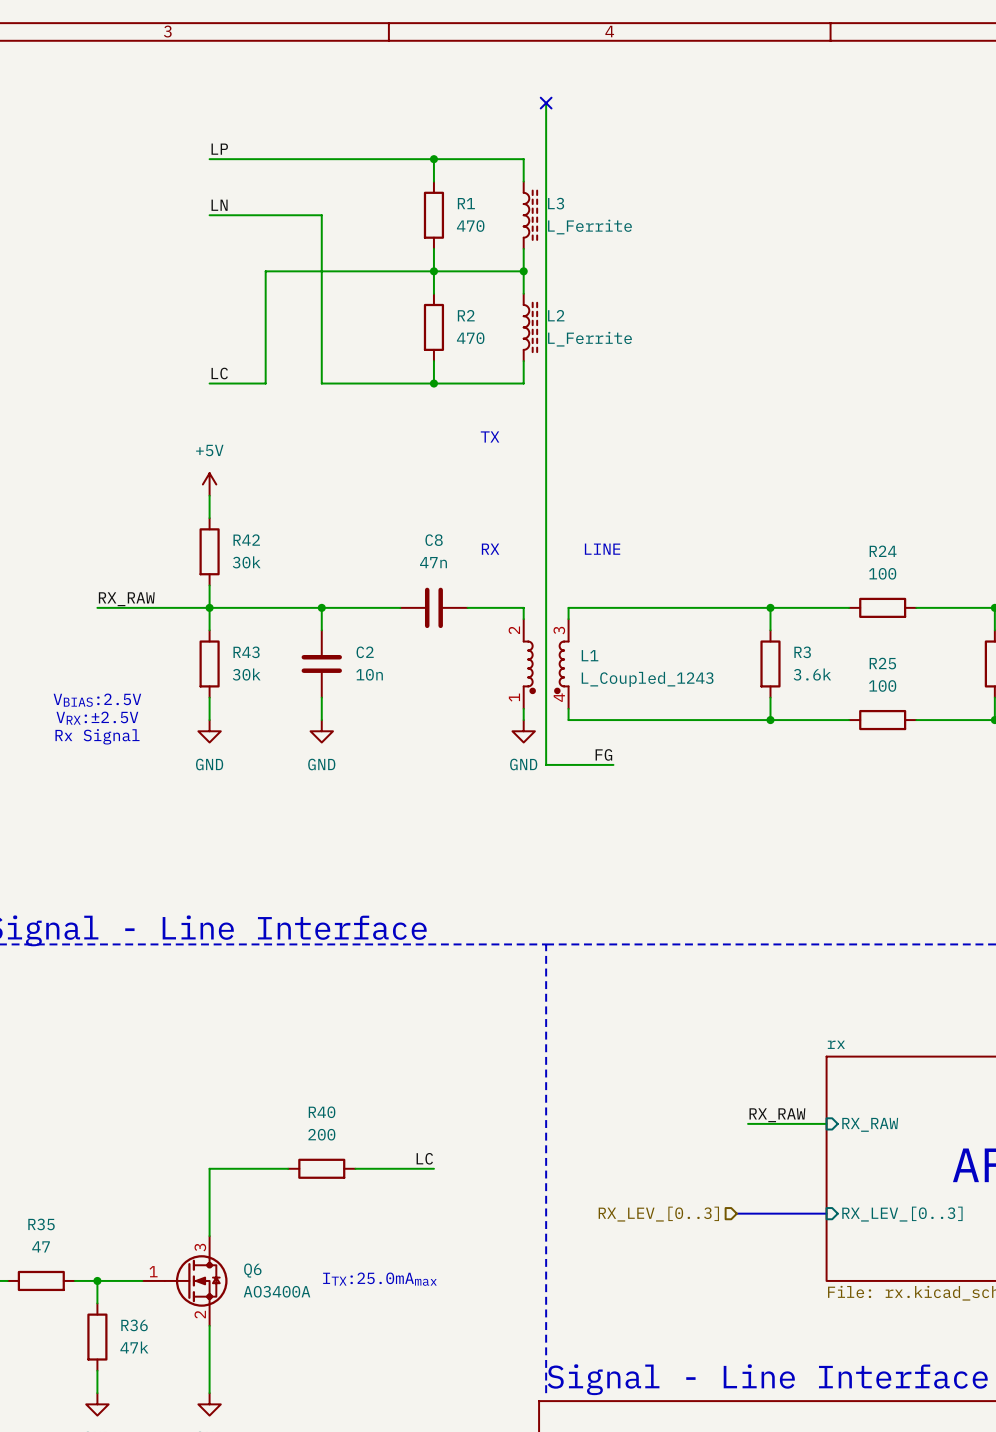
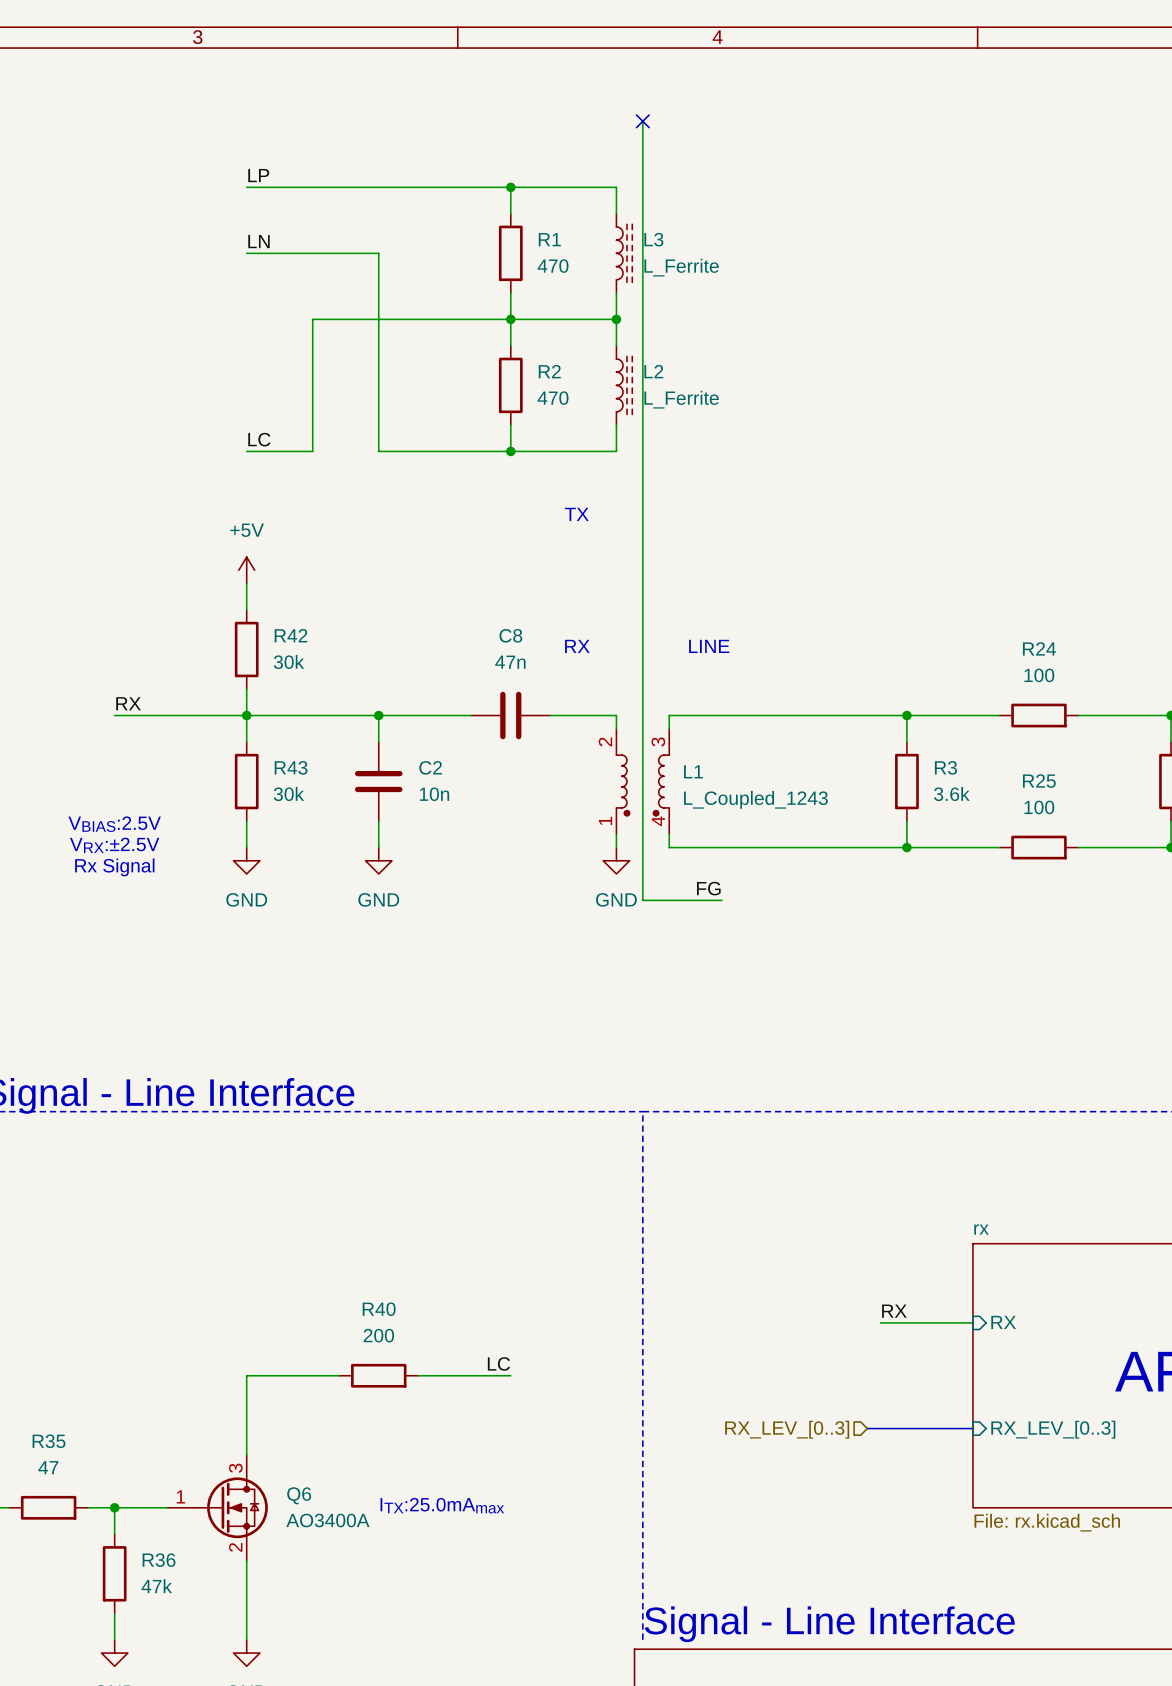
label: RX_RAW (126, 599) -> RX (128, 703)
label: RX_RAW (777, 1115) -> RX (894, 1311)
sheet pin: RX_RAW (870, 1124) -> RX (1003, 1322)

